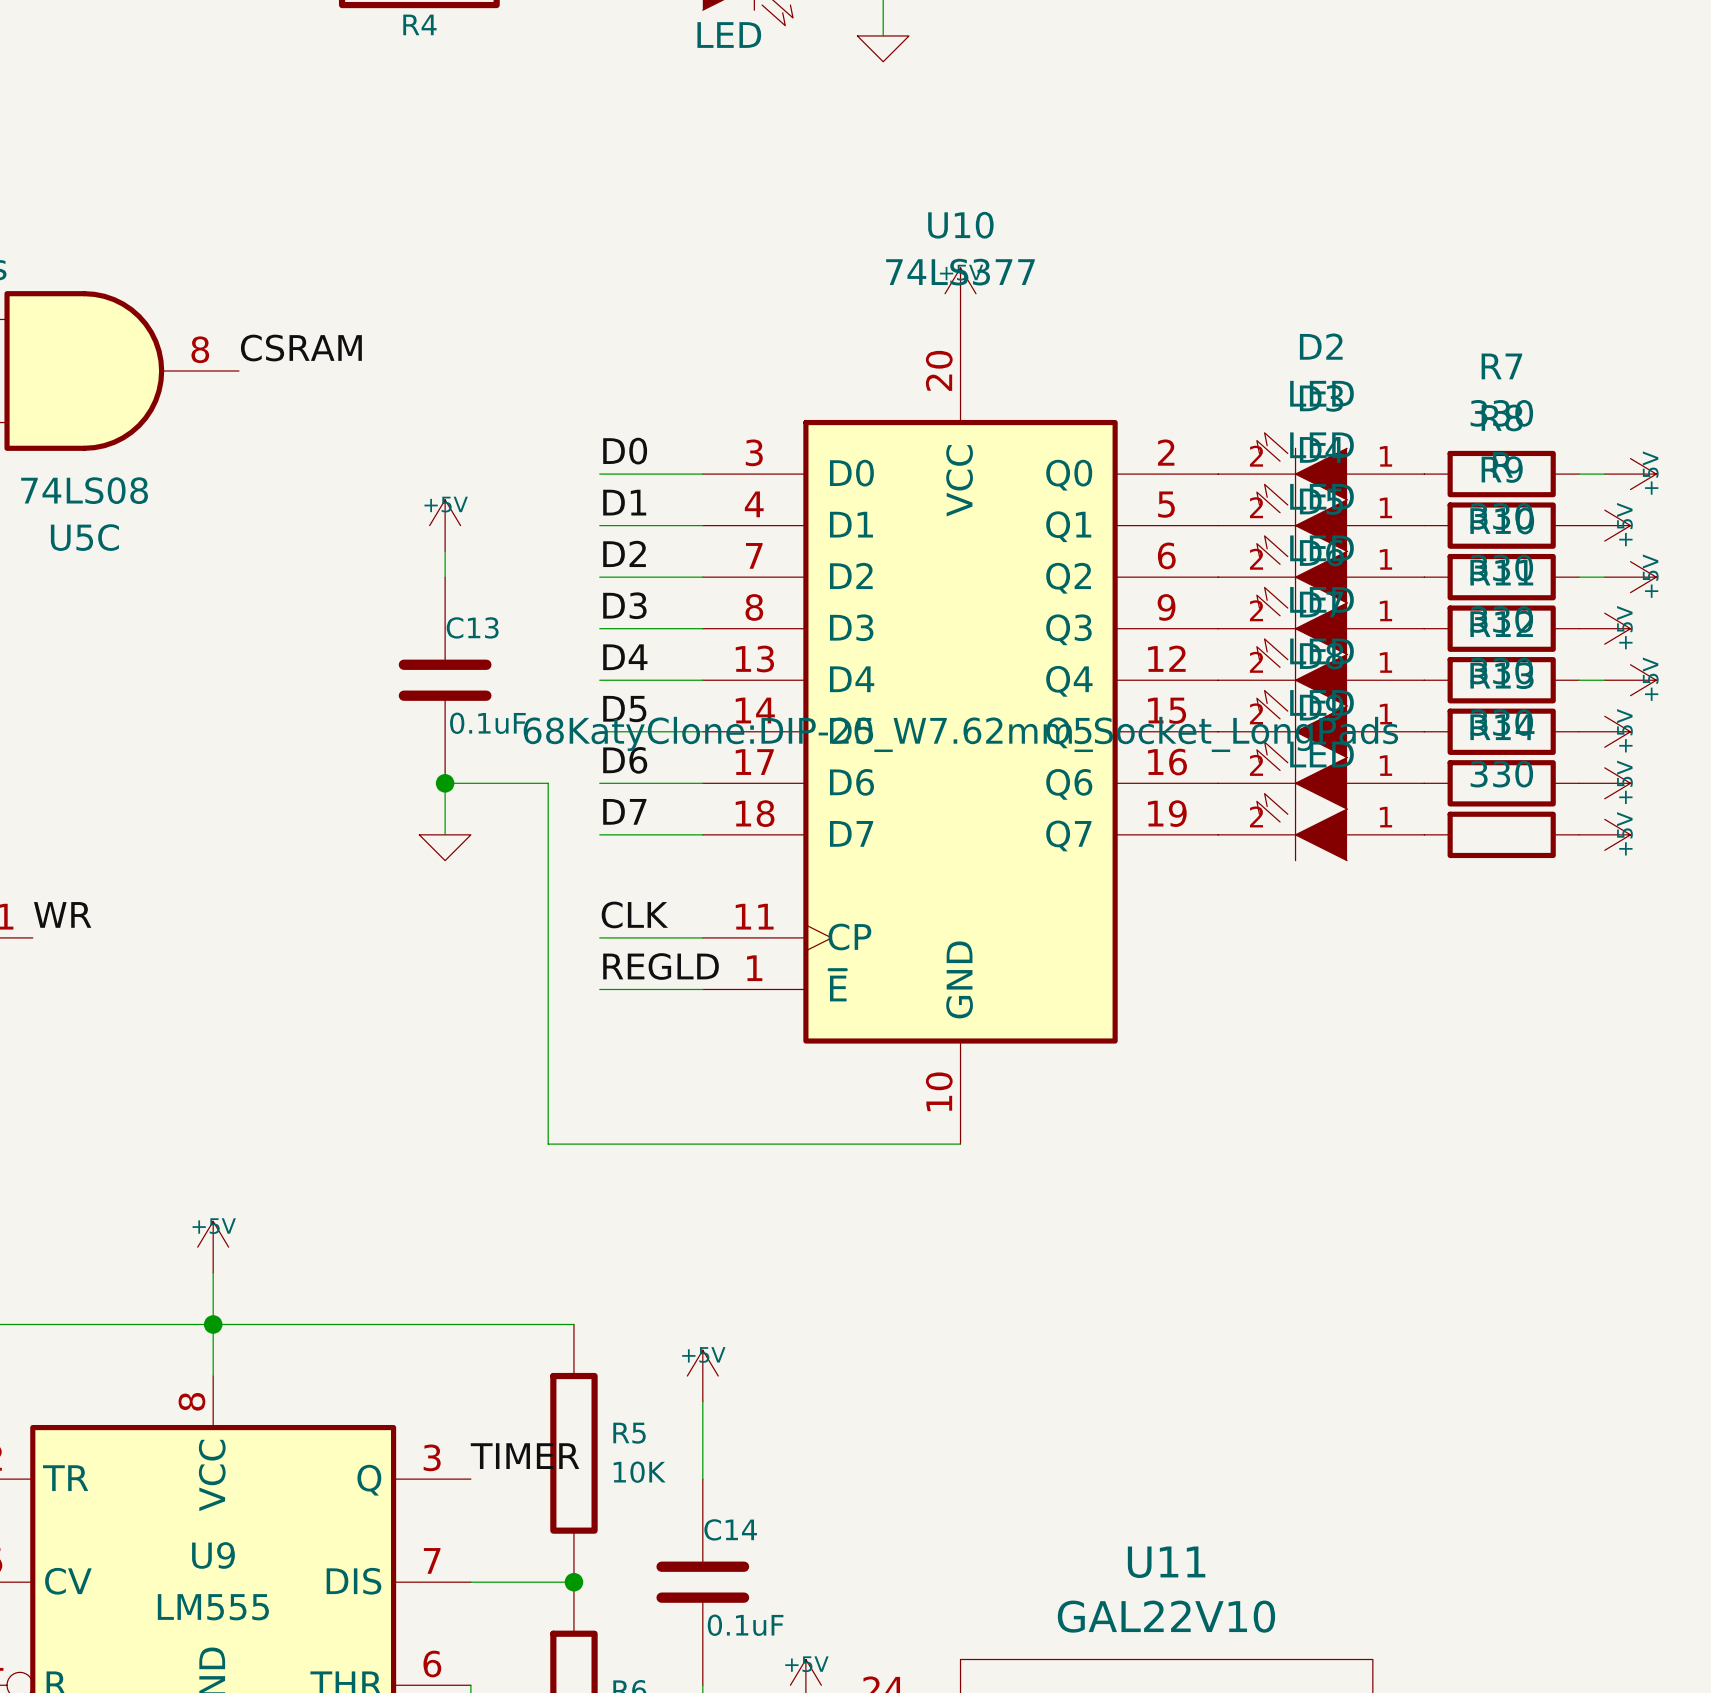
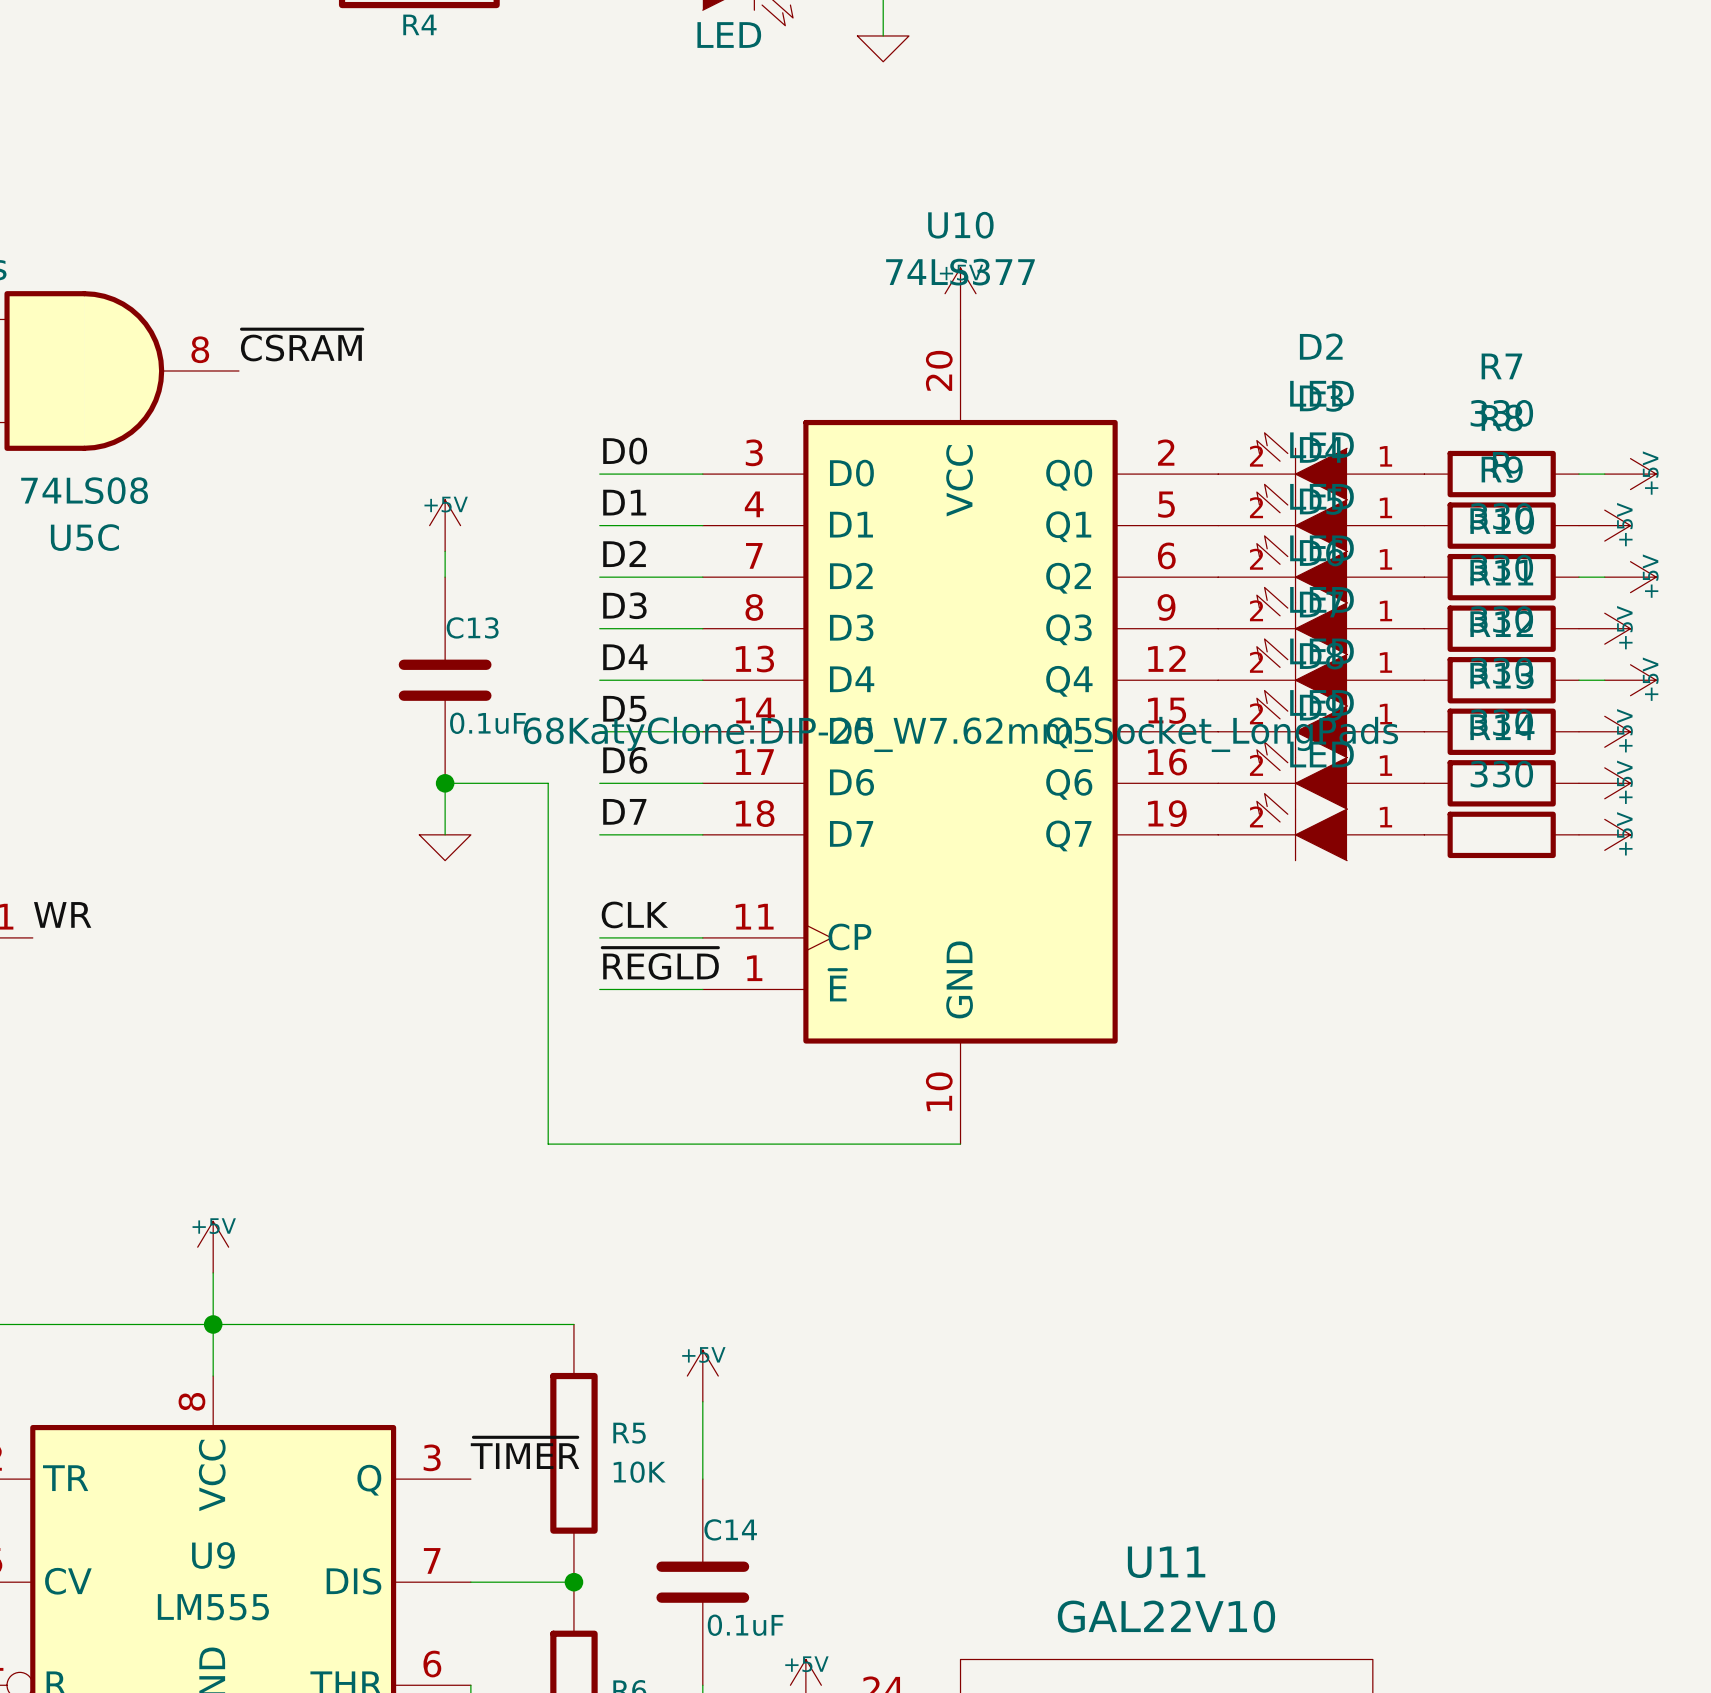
label: CSRAM (301, 348) -> ~{CSRAM} (301, 345)
label: REGLD (661, 966) -> ~{REGLD} (660, 963)
label: TIMER (525, 1456) -> ~{TIMER} (525, 1453)

